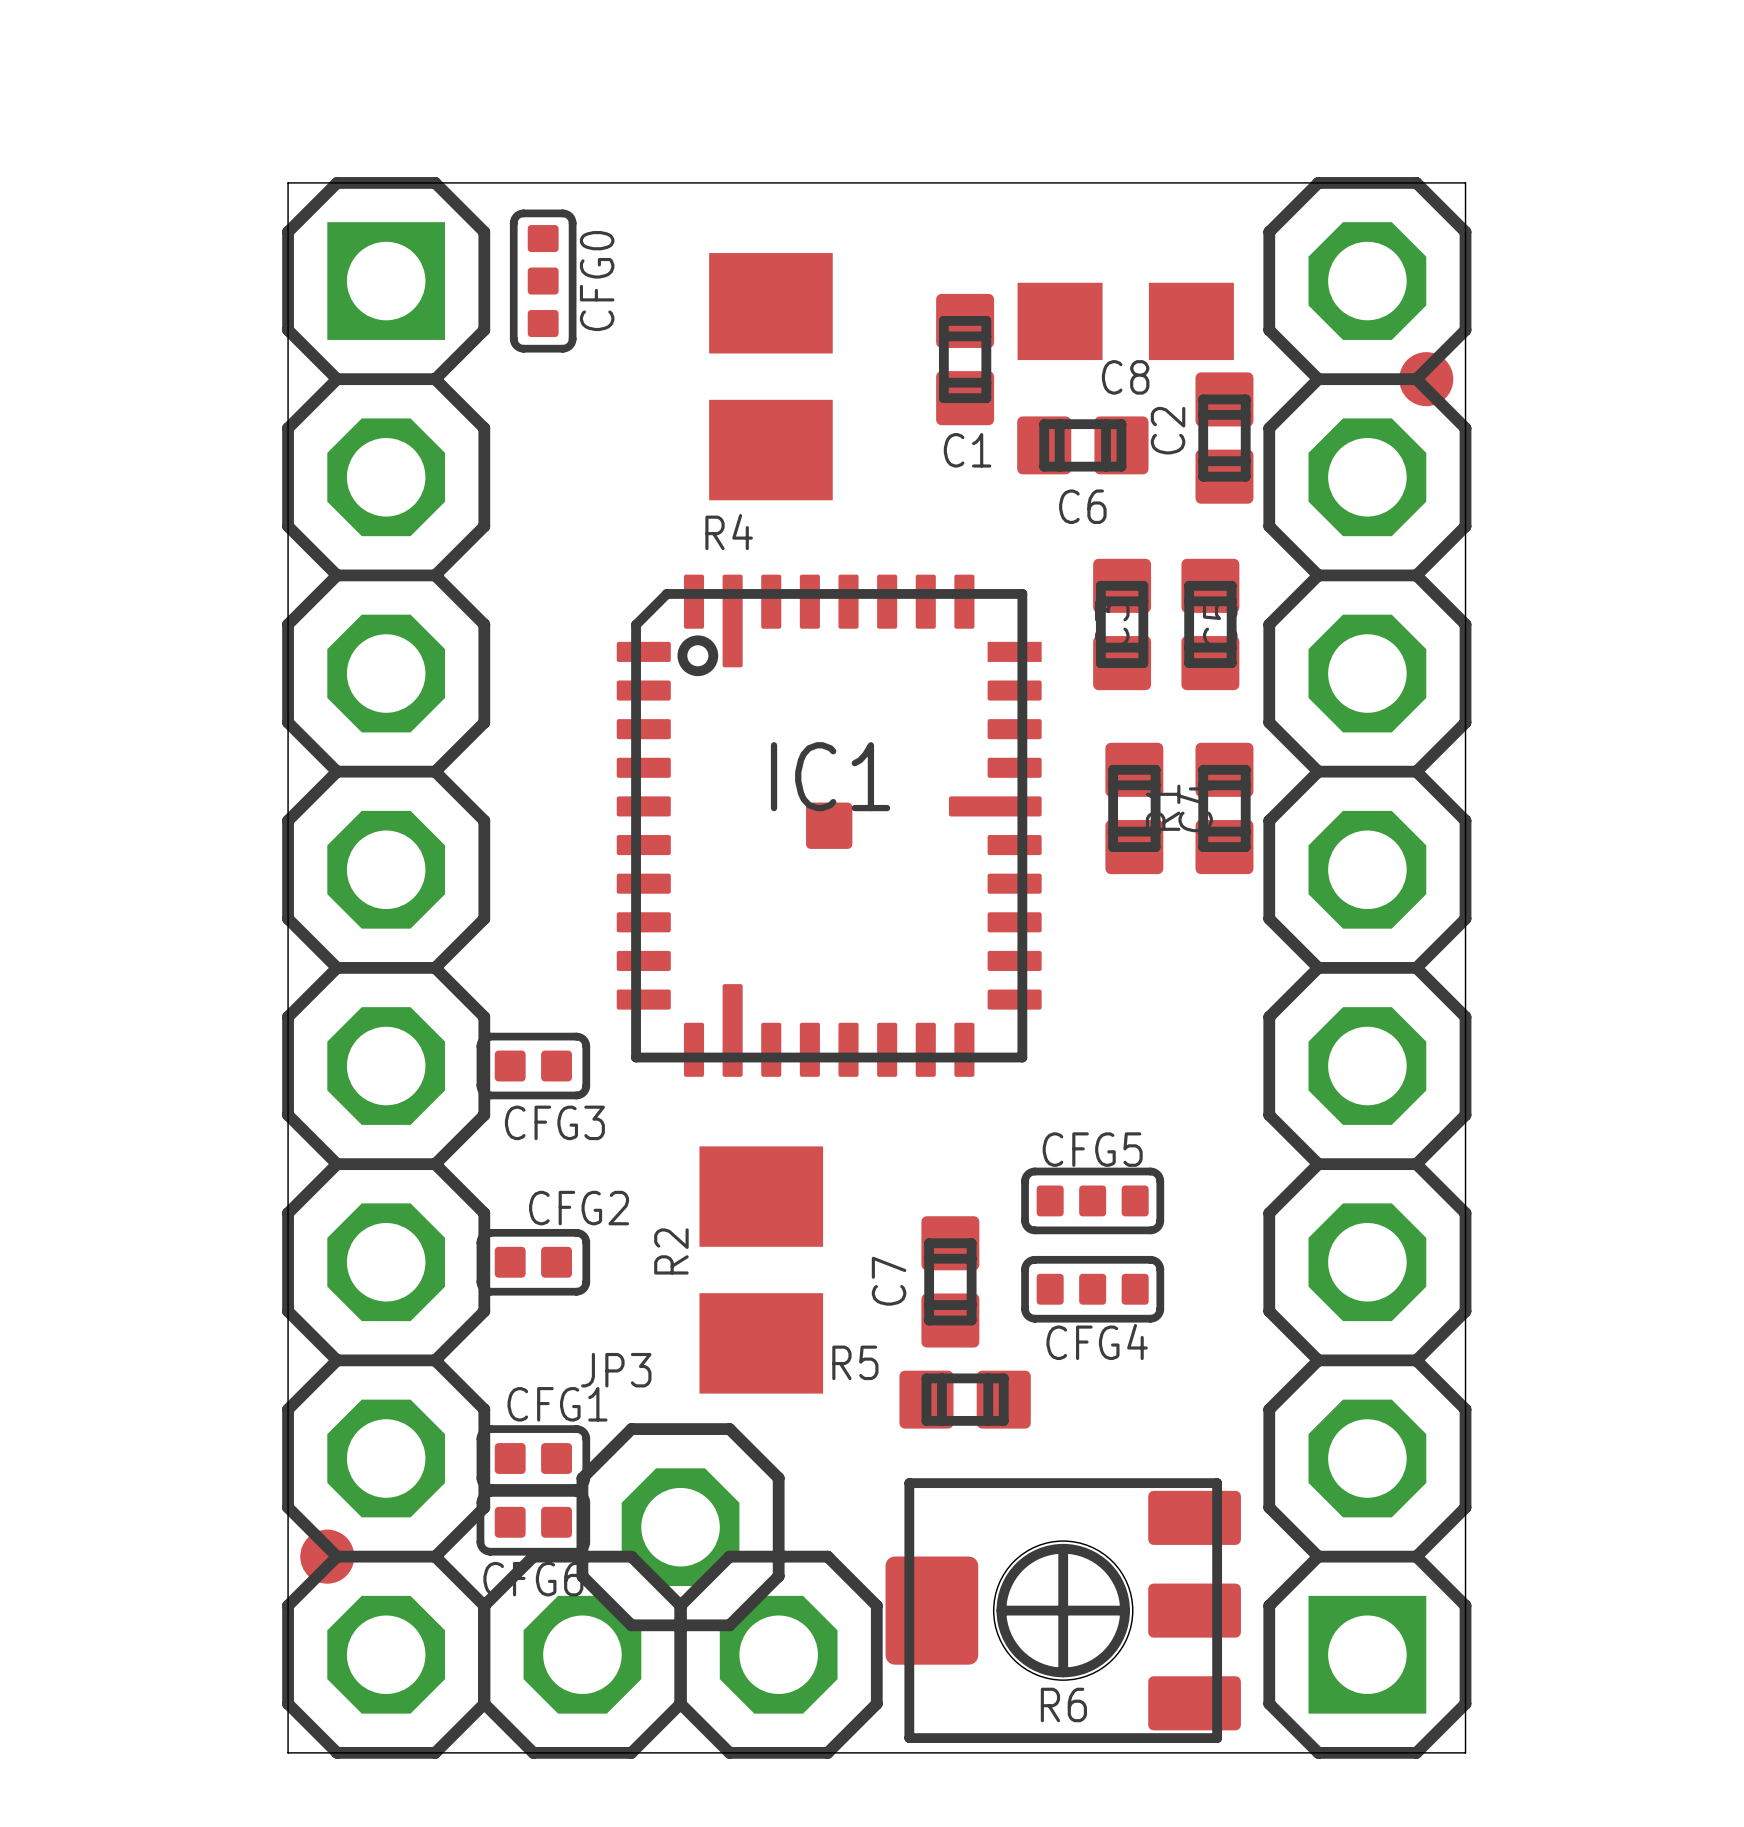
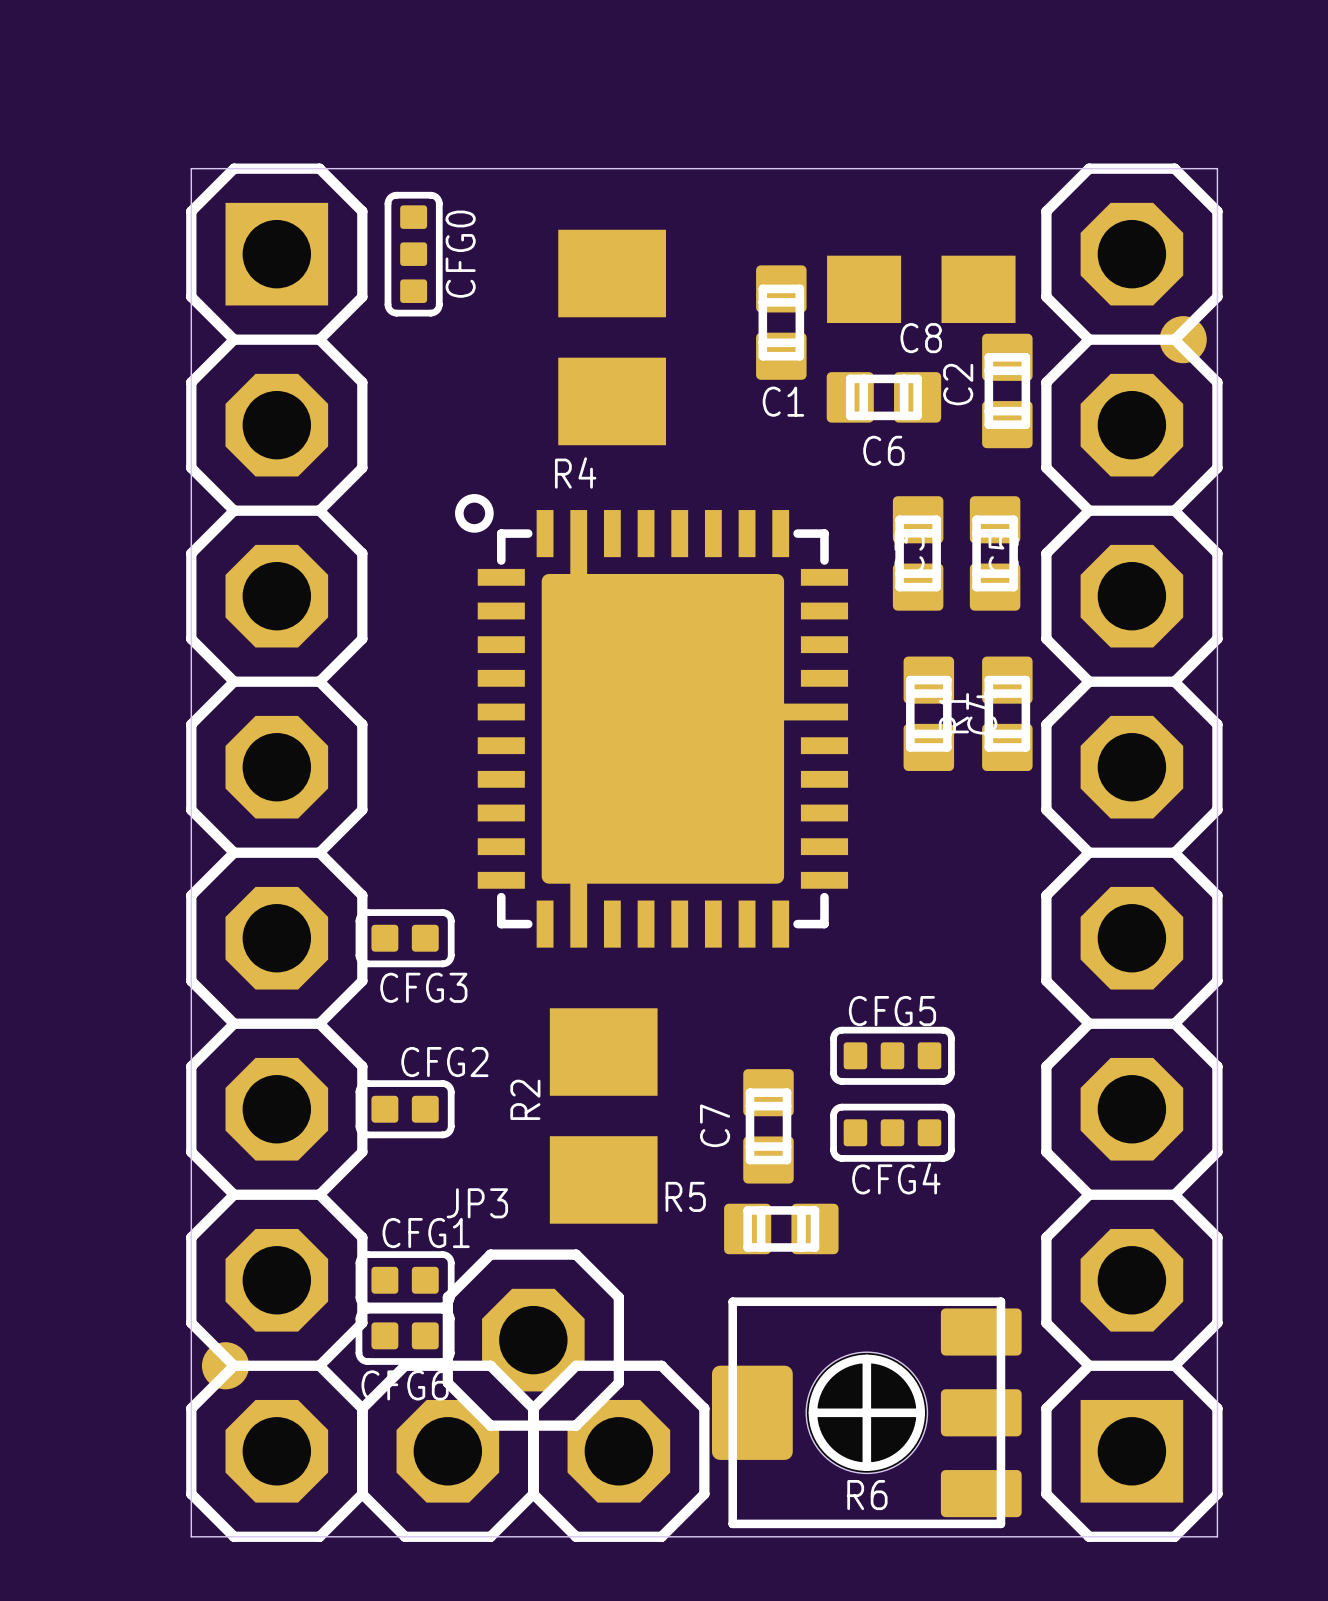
part: none -> (651, 720)
IC1: (829, 825) -> none

